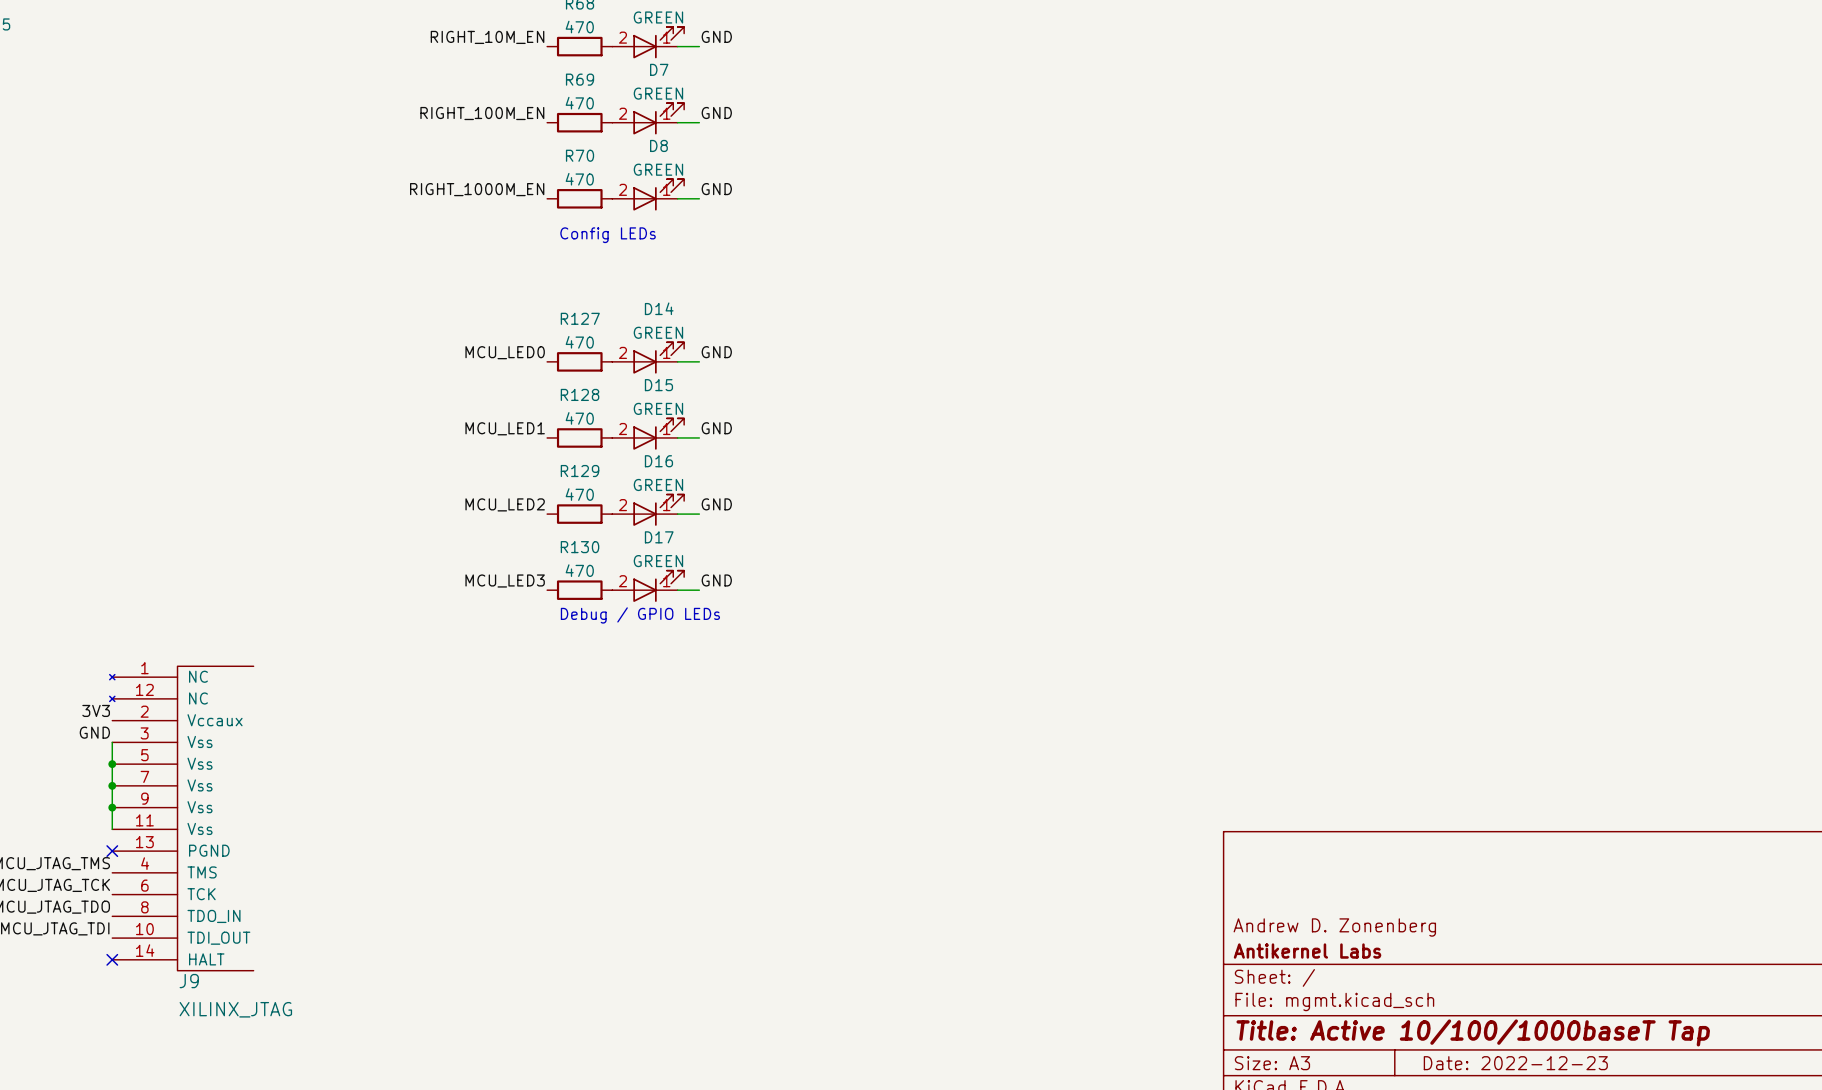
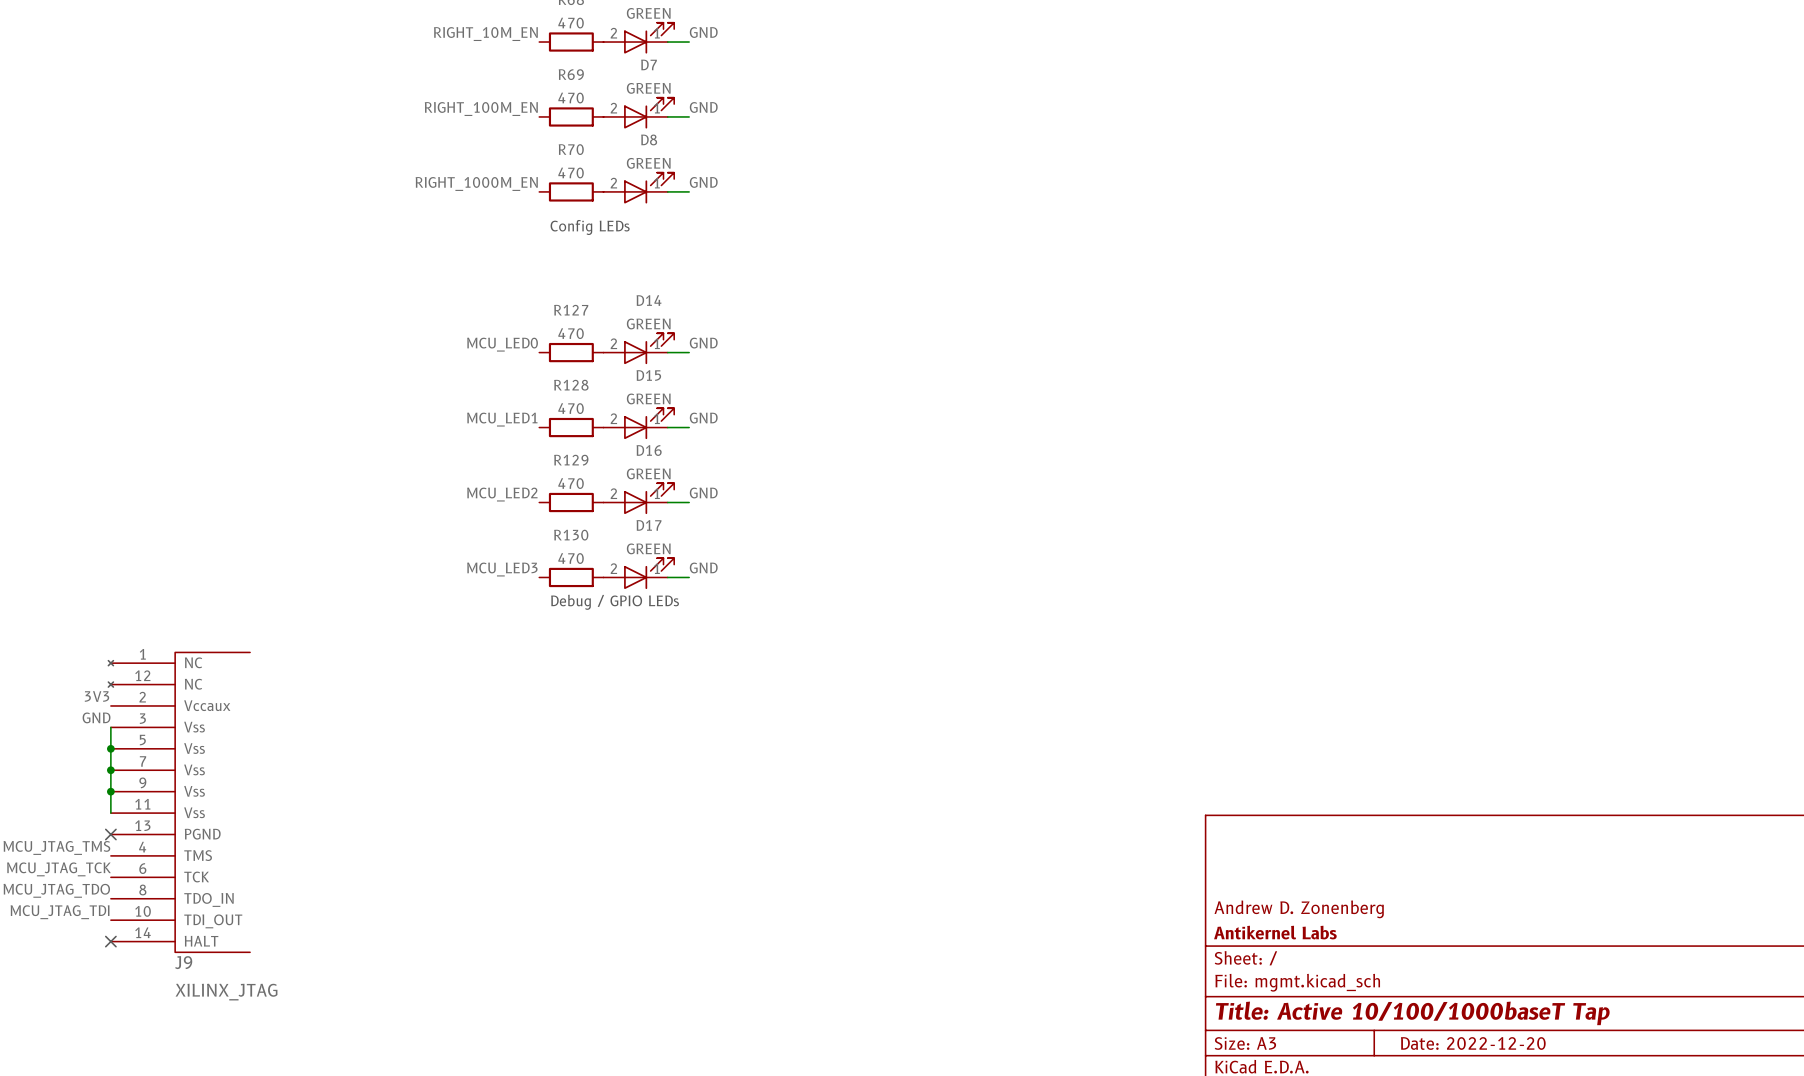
title block: Date: 2022-12-23 (1515, 1063) -> Date: 2022-12-20 (1473, 1043)

